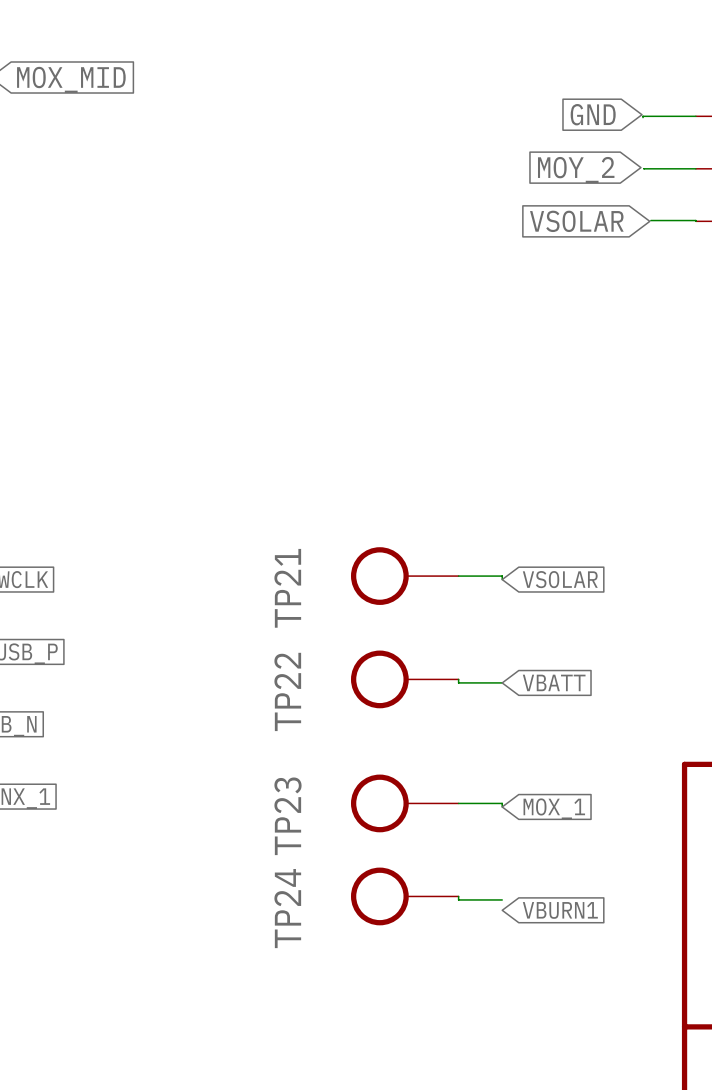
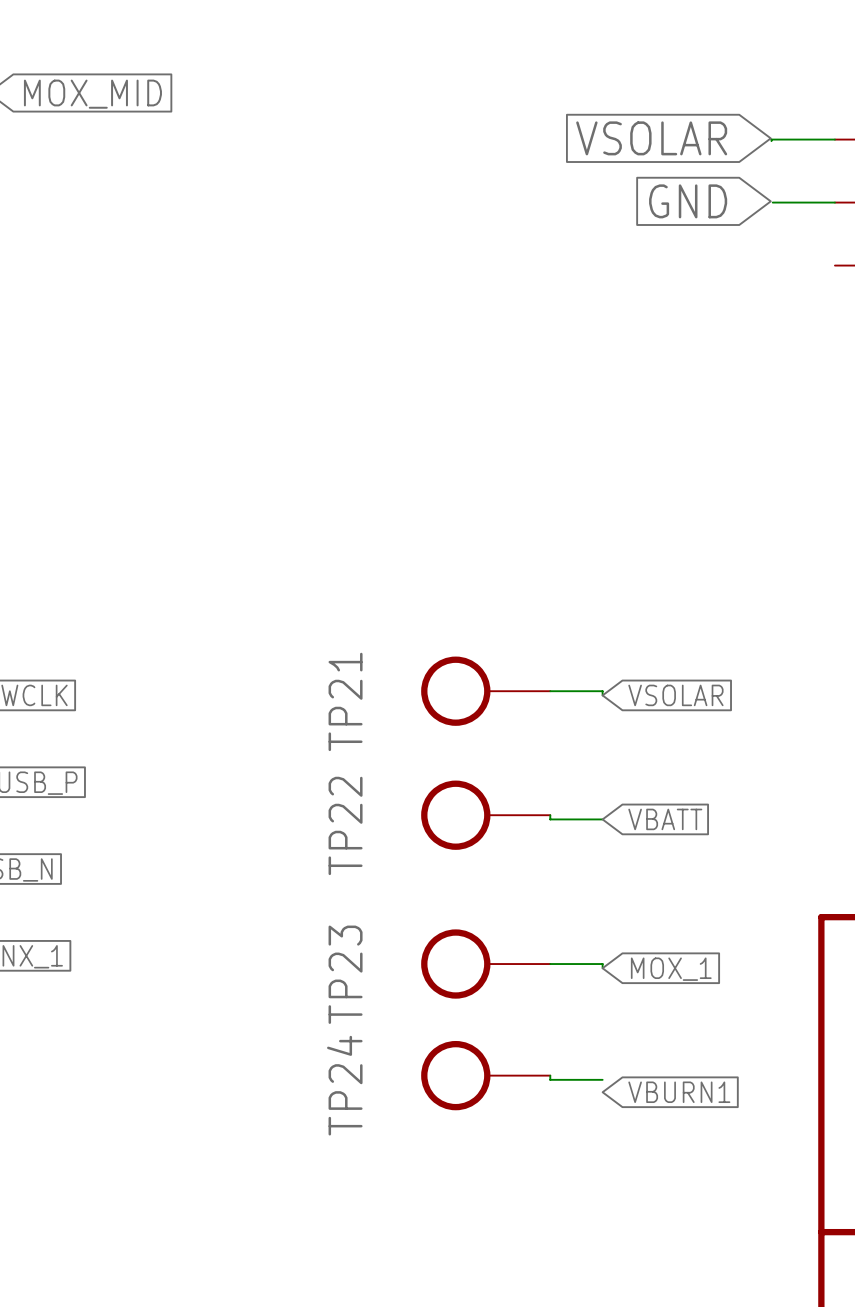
global label: GND (593, 114) -> VSOLAR (651, 138)
global label: MOY_2 (576, 169) -> GND (688, 201)
wire: (650, 220) (695, 221) -> none
global label: VSOLAR (576, 221) -> none

